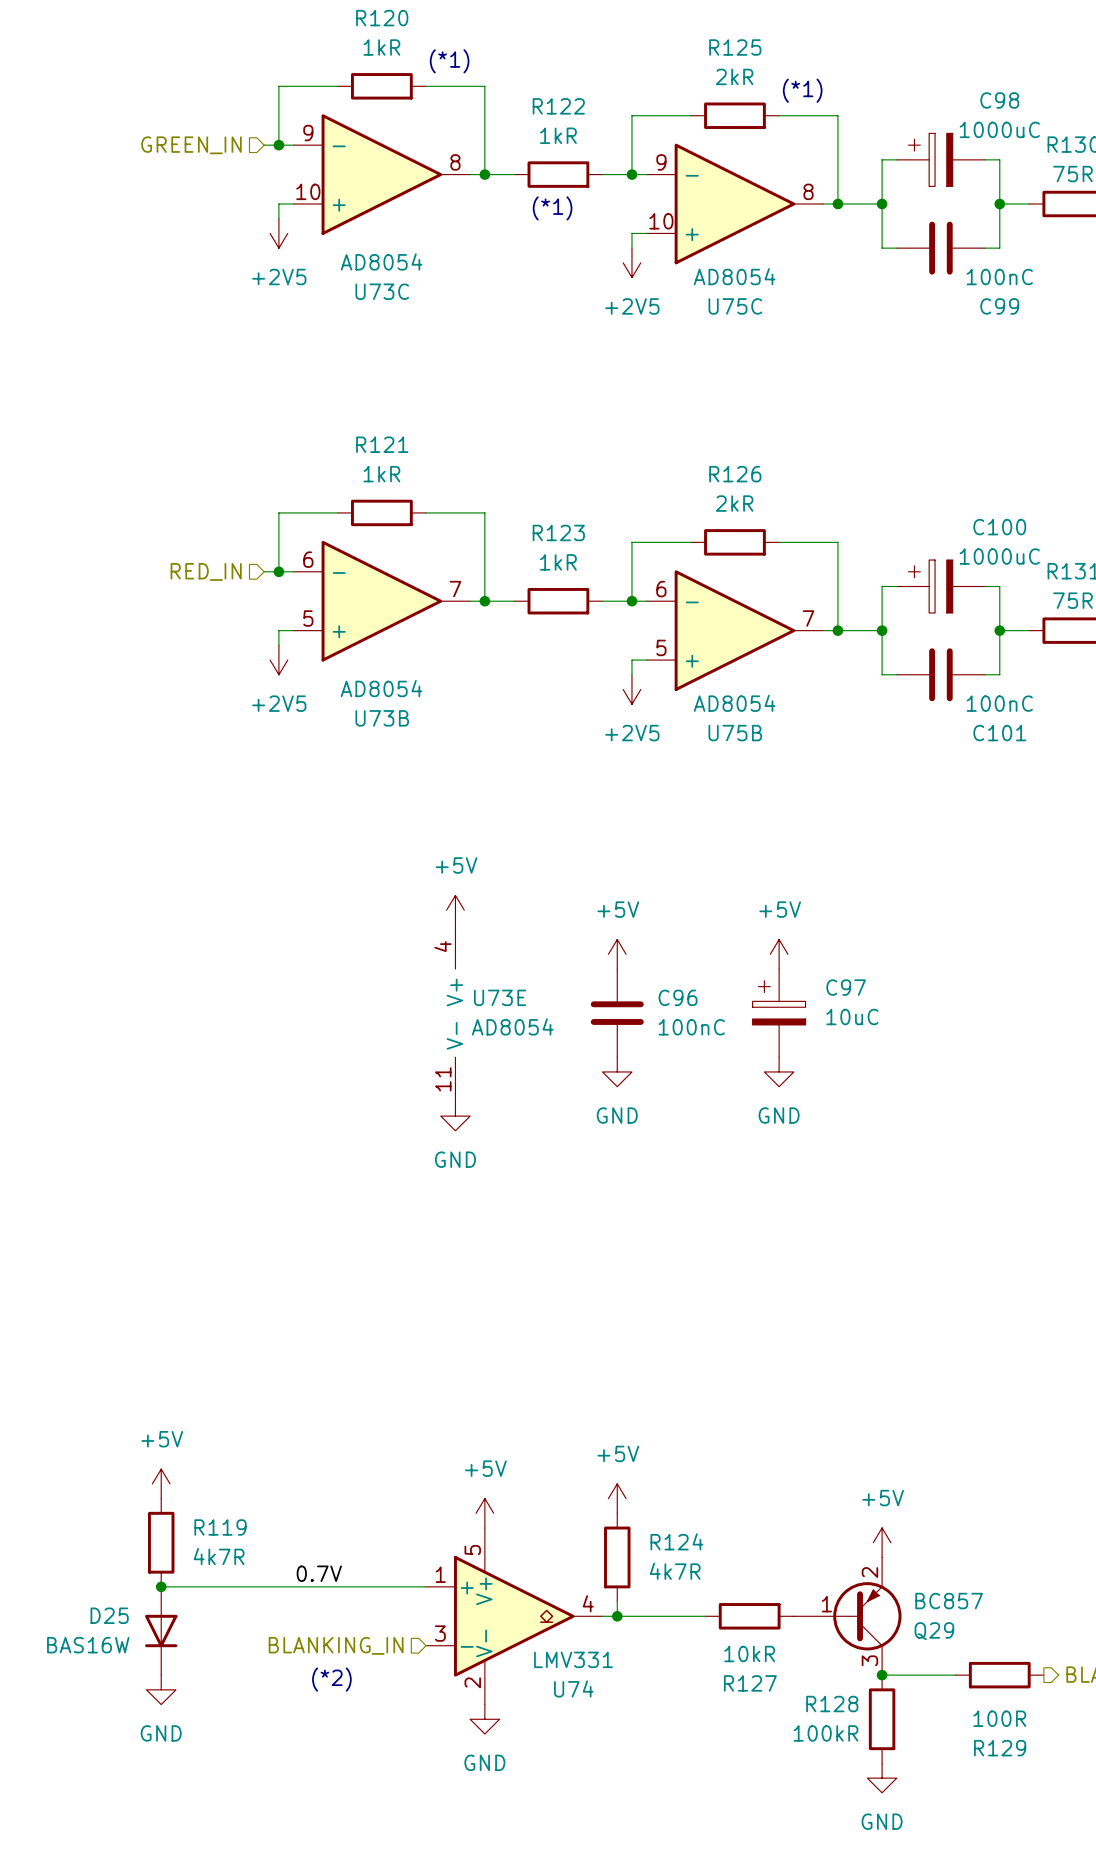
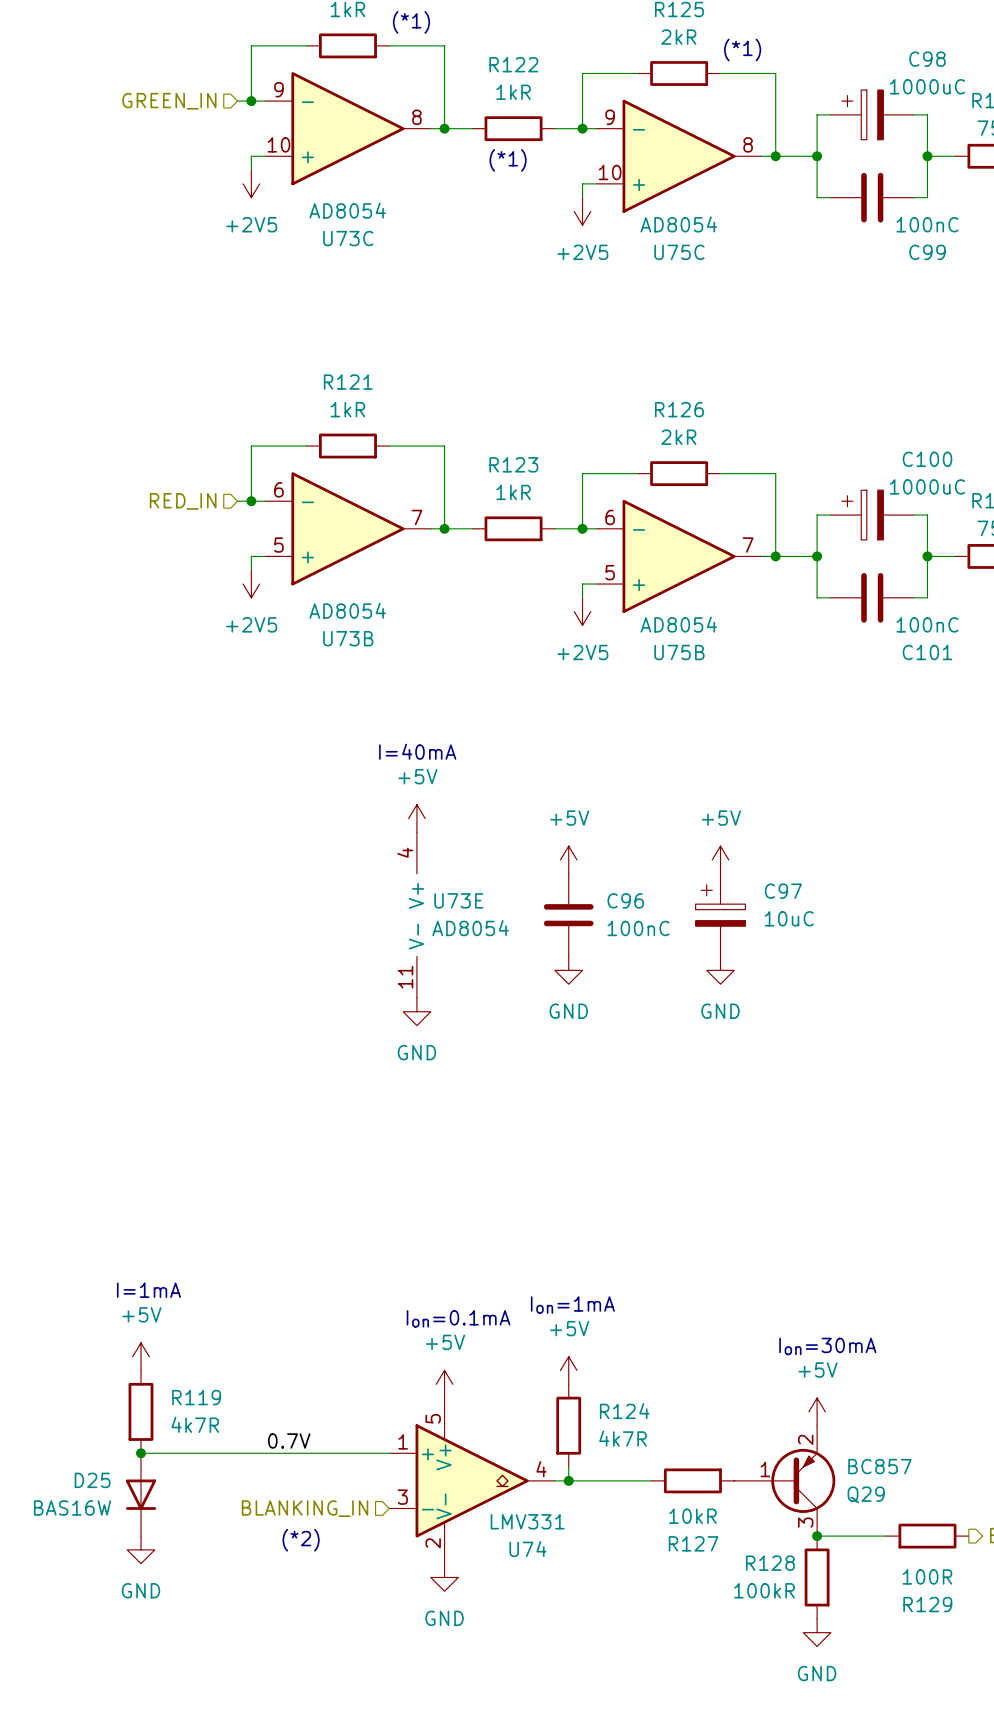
text: none -> I=40mA (417, 751)
text: none -> I=1mA (148, 1290)
text: none -> Ion=1mA (572, 1305)
text: none -> Ion=0.1mA (458, 1318)
text: none -> Ion=30mA (827, 1346)

